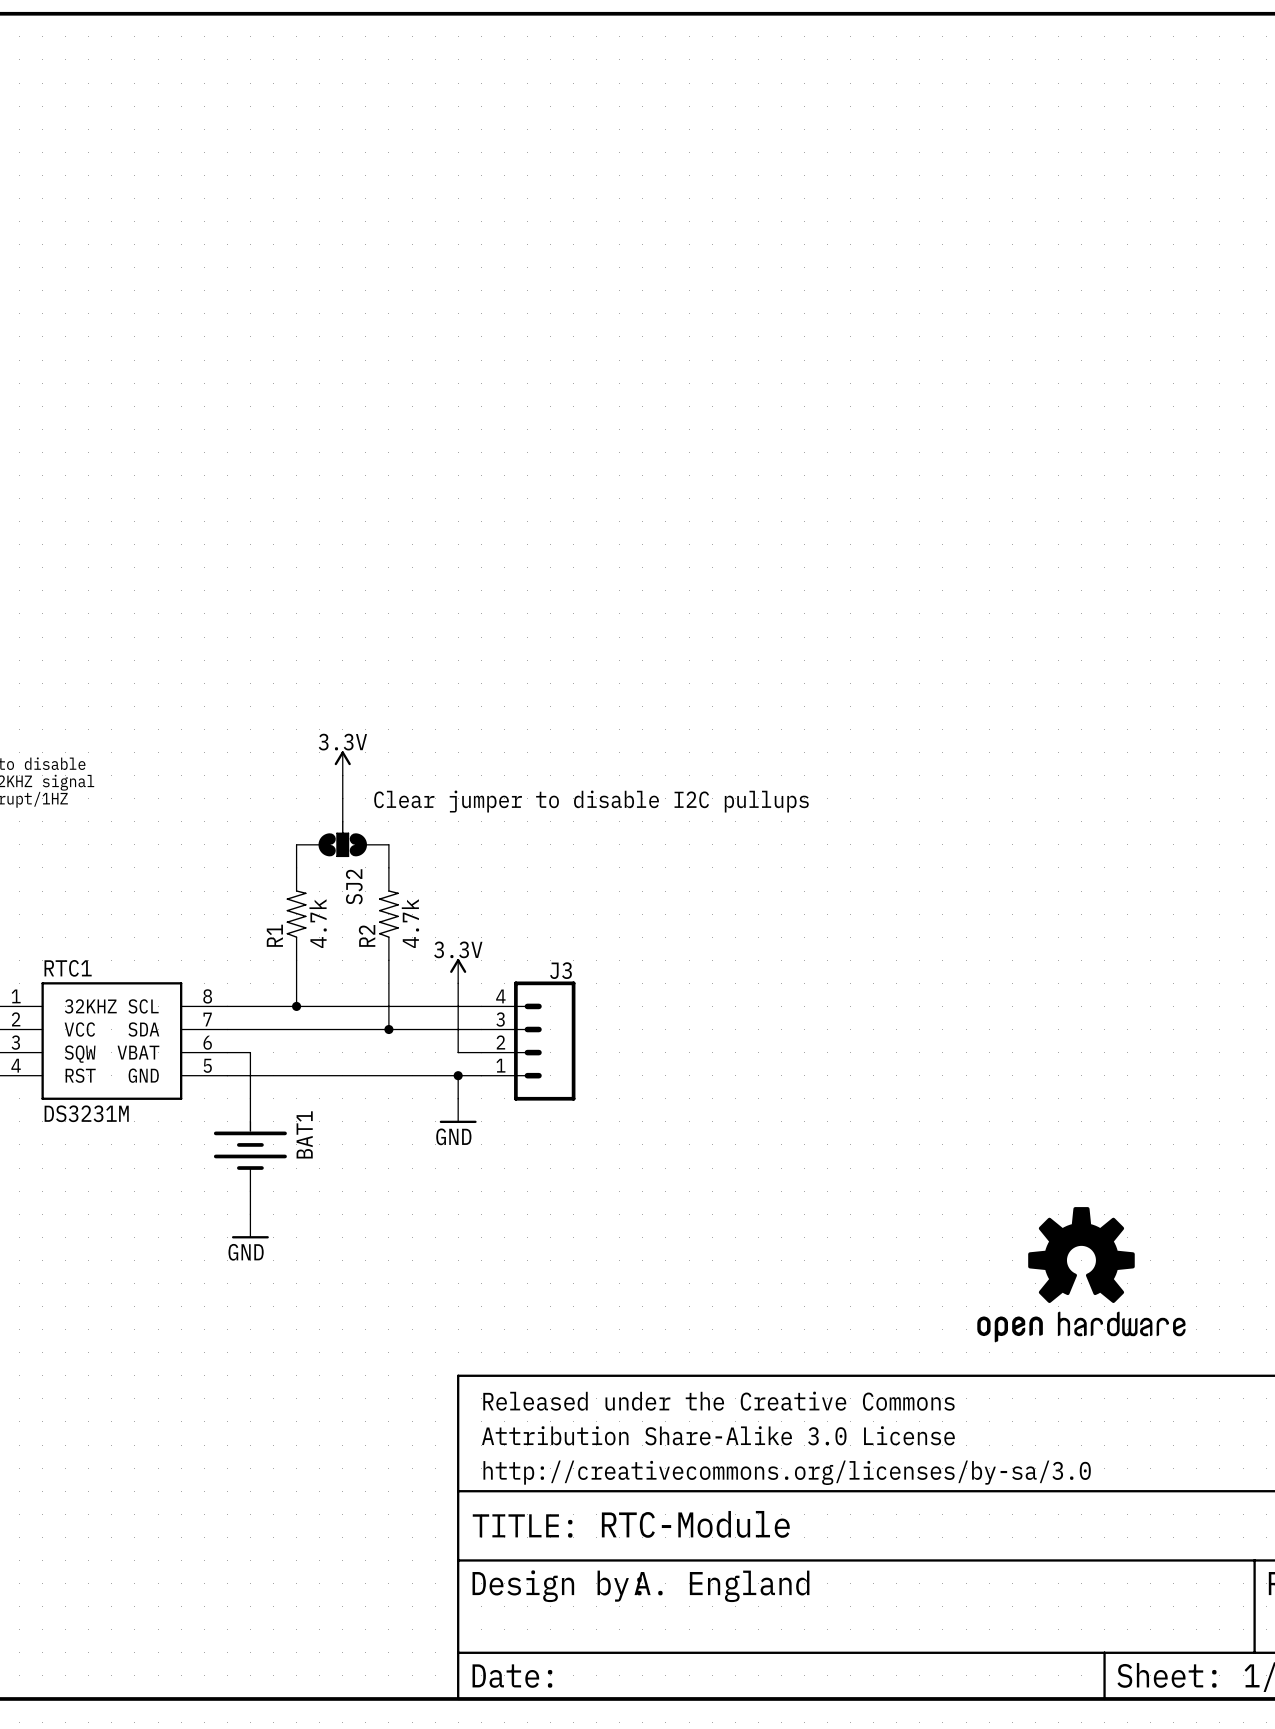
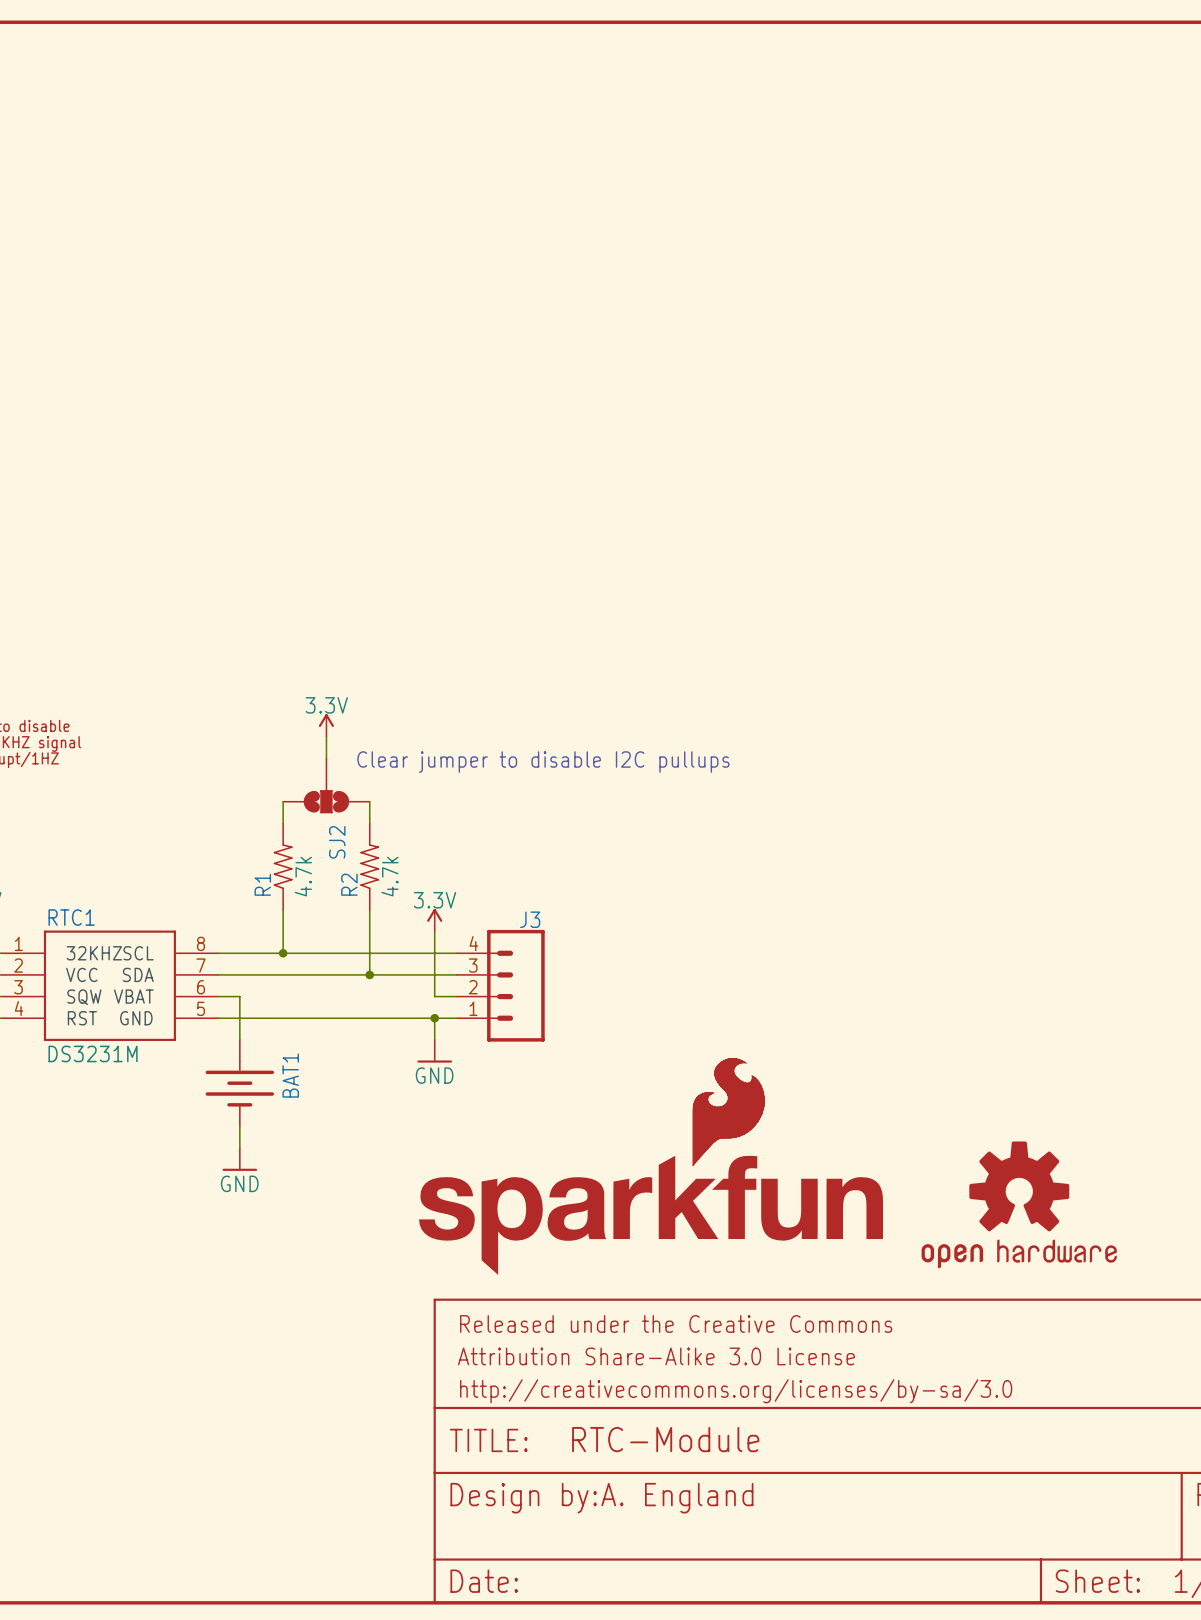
part: none -> (651, 1166)

